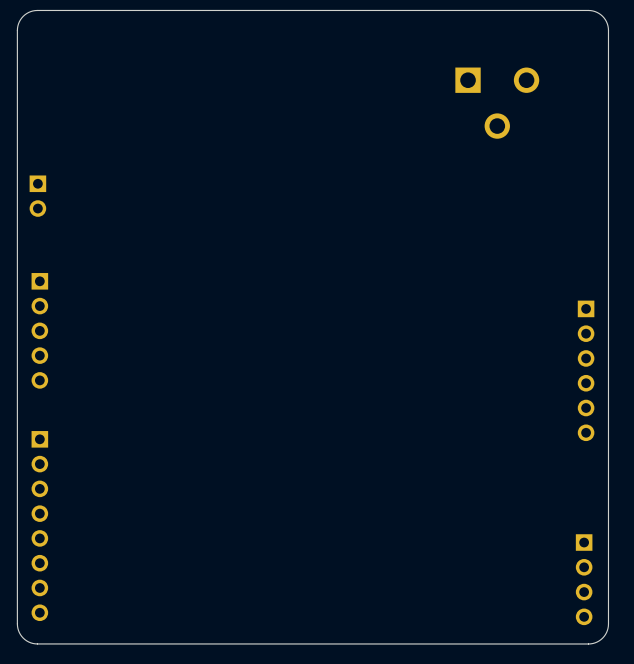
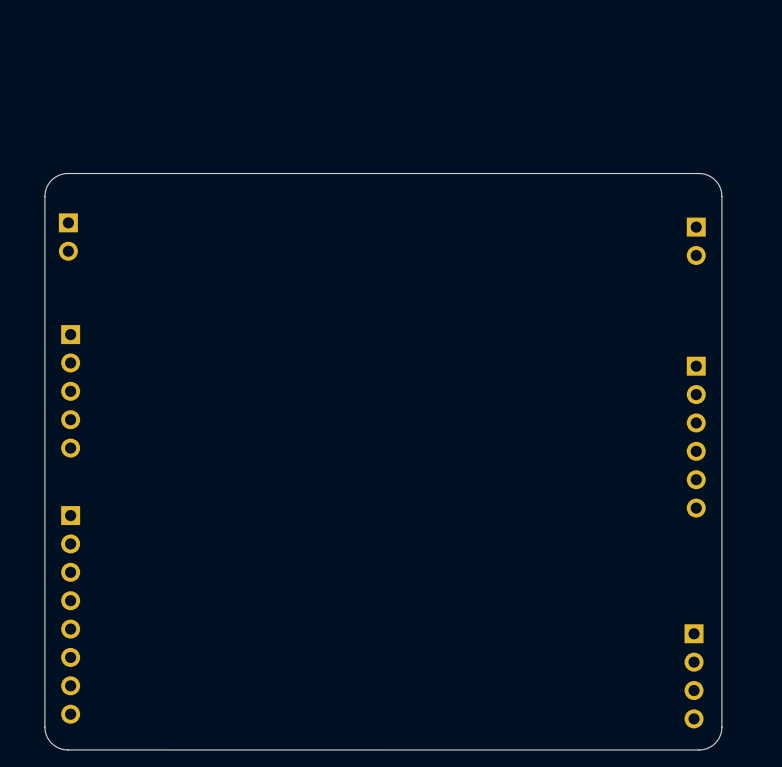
part: (497, 103) -> none
board edge: (608, 160) (608, 28) (602, 16) (588, 10) (32, 10) (21, 18) (17, 28) (17, 160) -> (721, 196) (720, 188) (715, 180) (706, 174) (699, 173) (67, 173) (57, 175) (51, 180) (46, 188) (44, 196)
part: none -> (696, 241)

